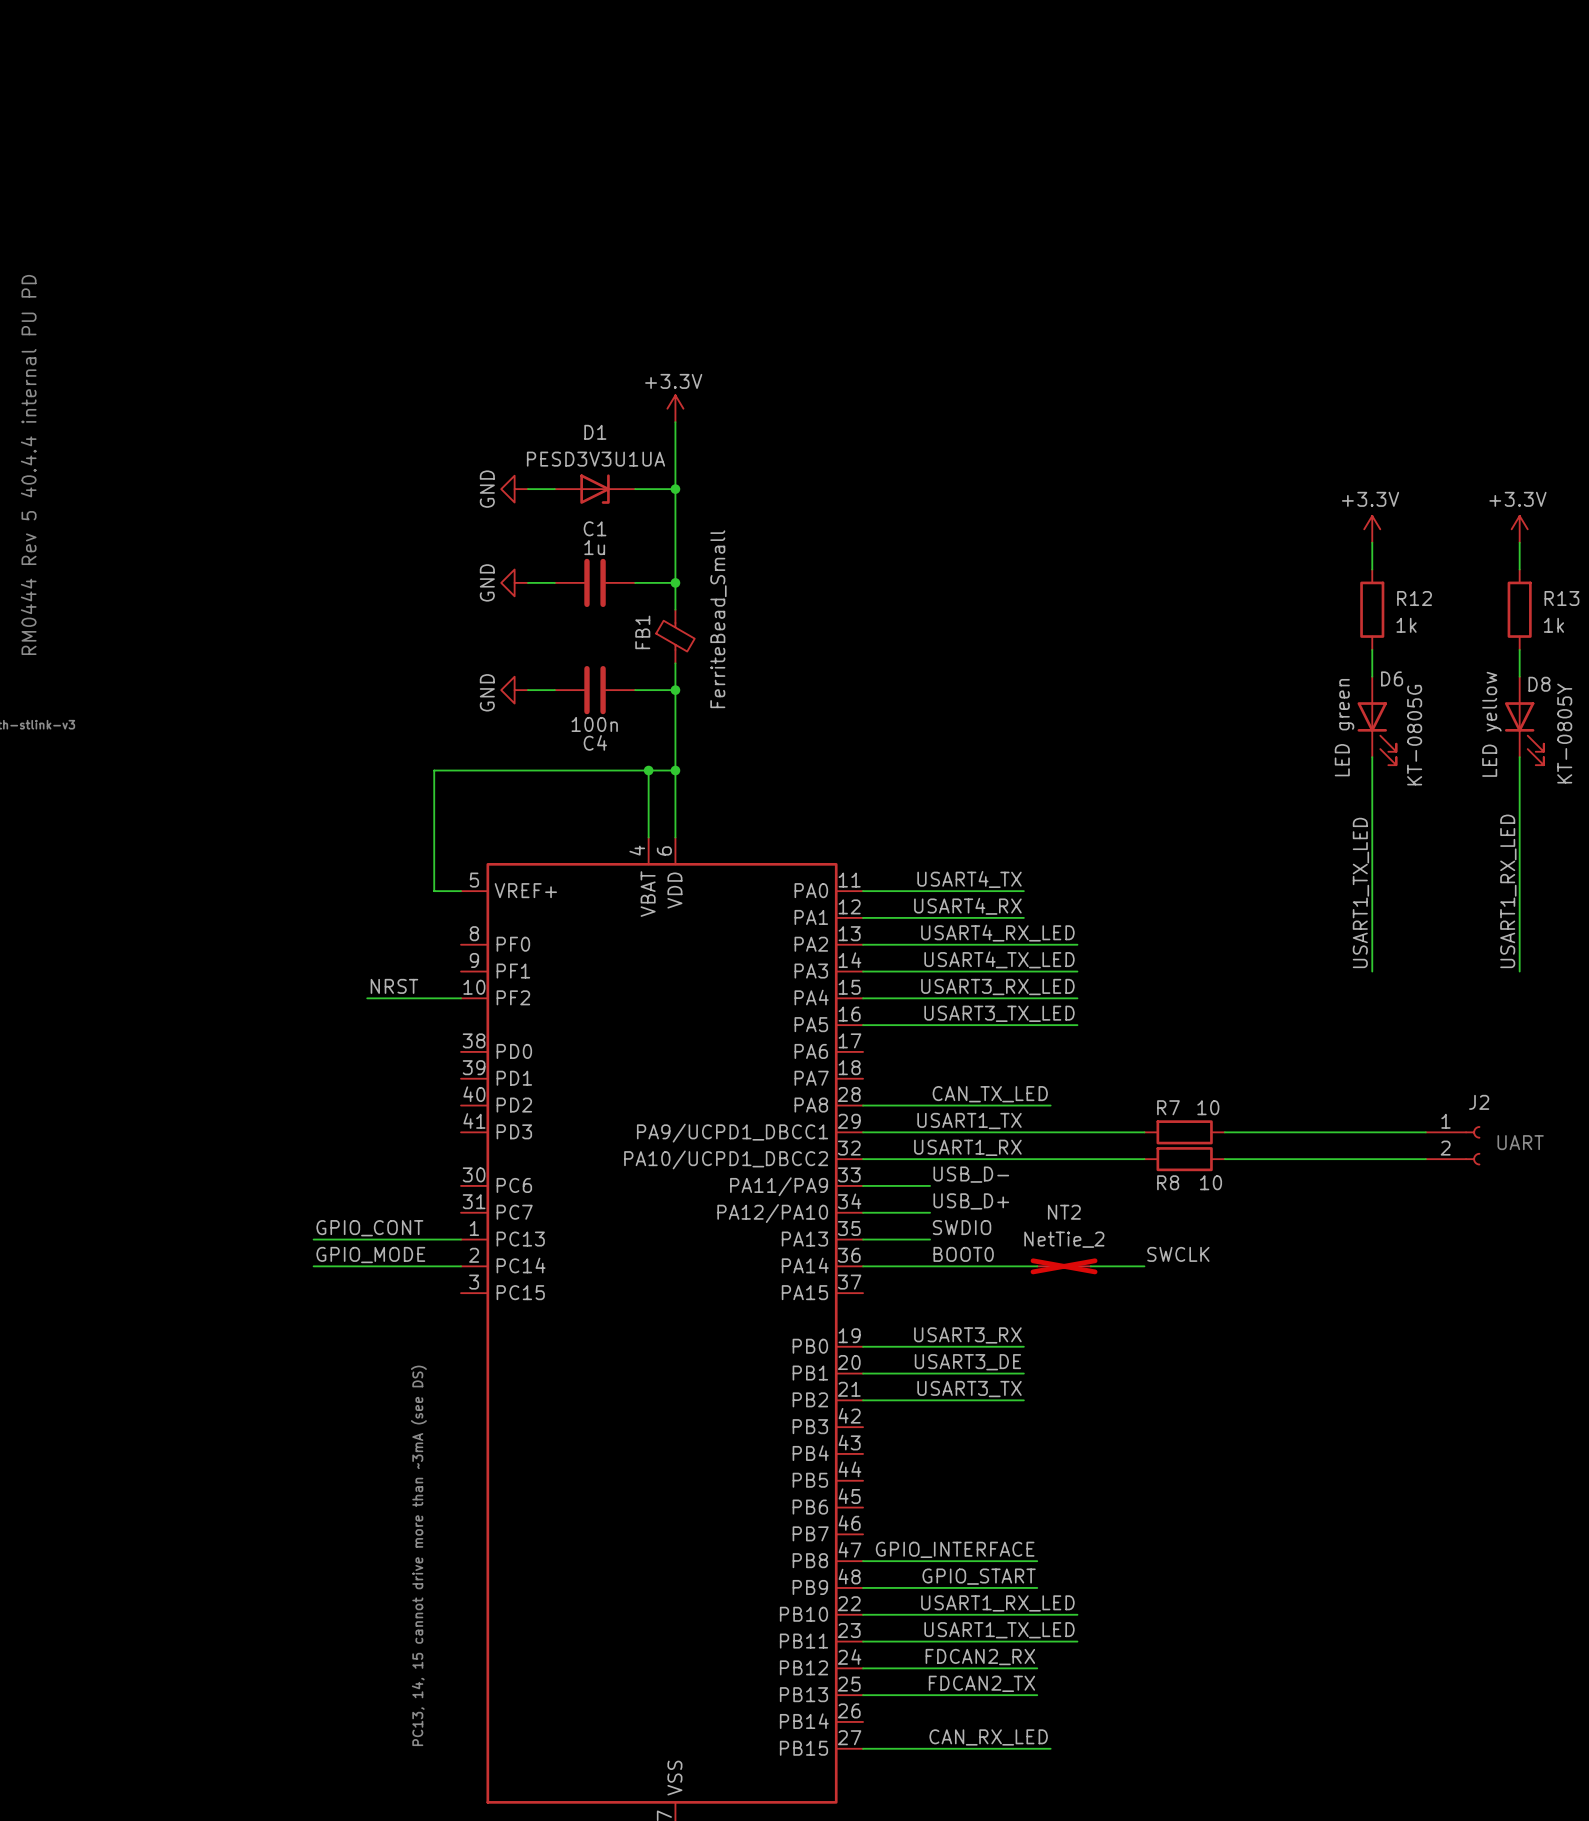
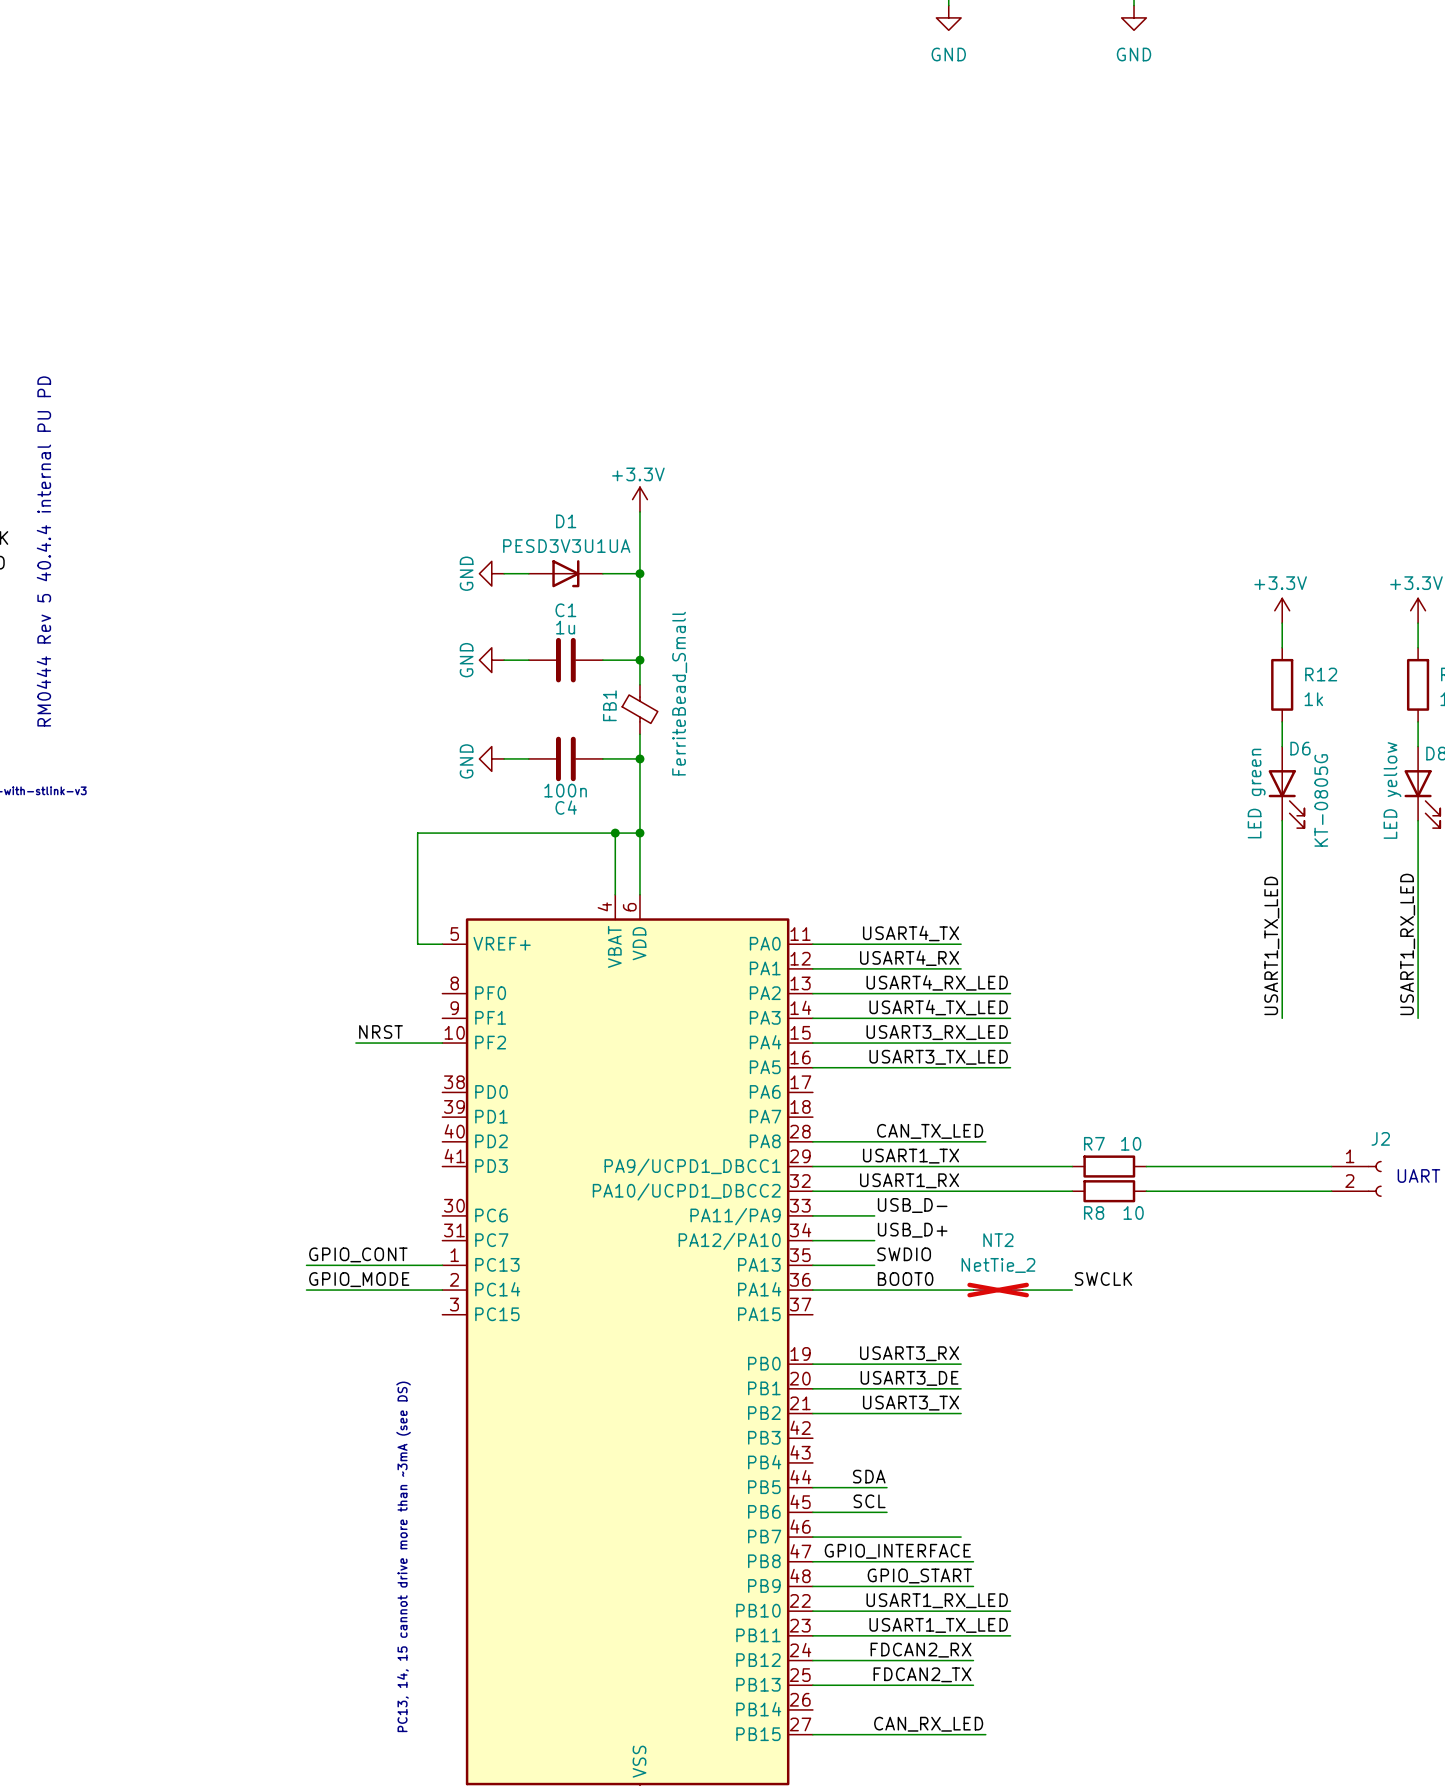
label: none -> SDA (869, 1476)
wire: none -> (812, 1487) (886, 1487)
label: none -> SCL (869, 1501)
wire: none -> (812, 1512) (886, 1512)
wire: none -> (812, 1537) (961, 1537)

